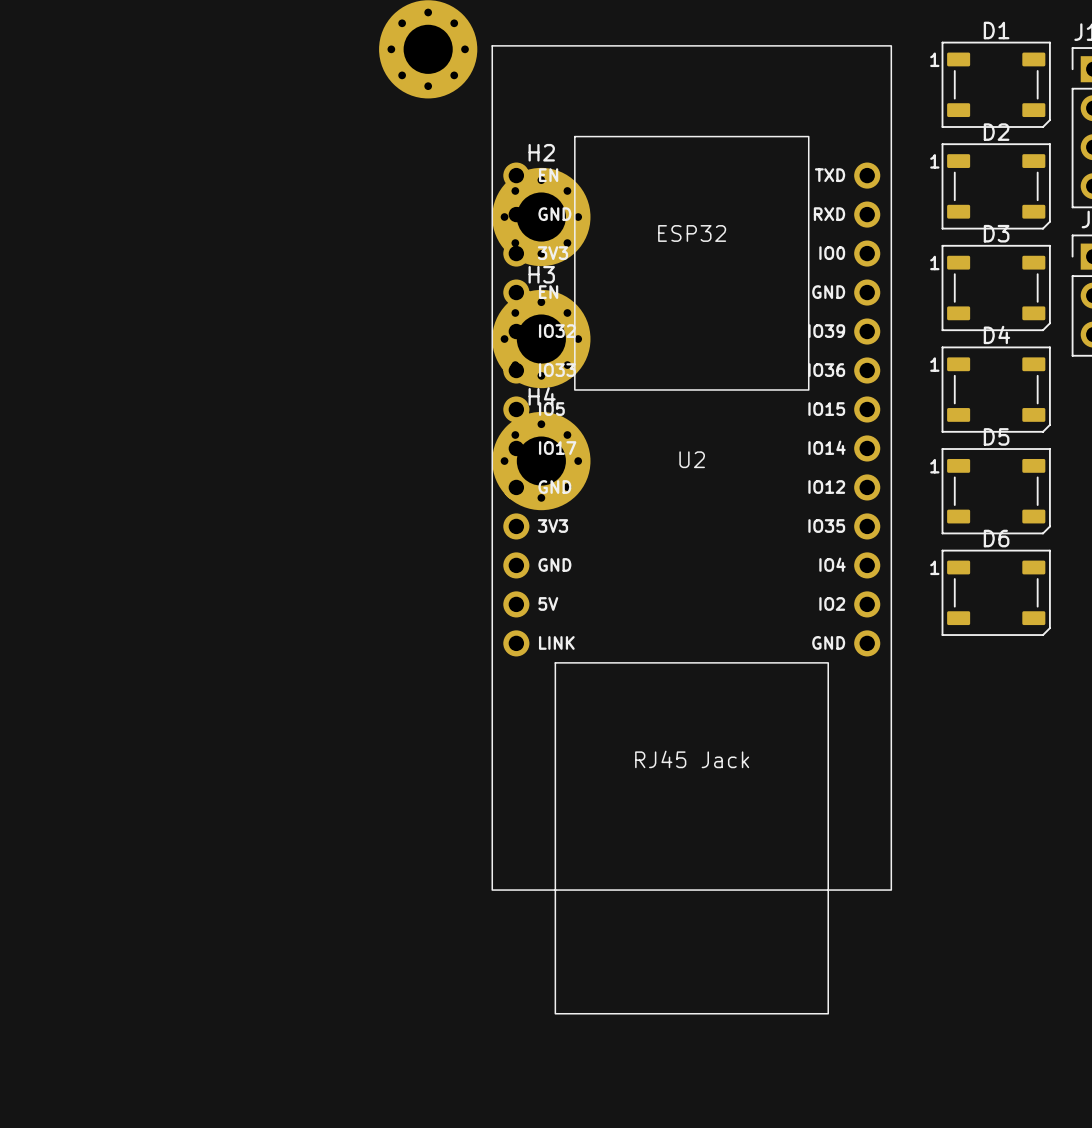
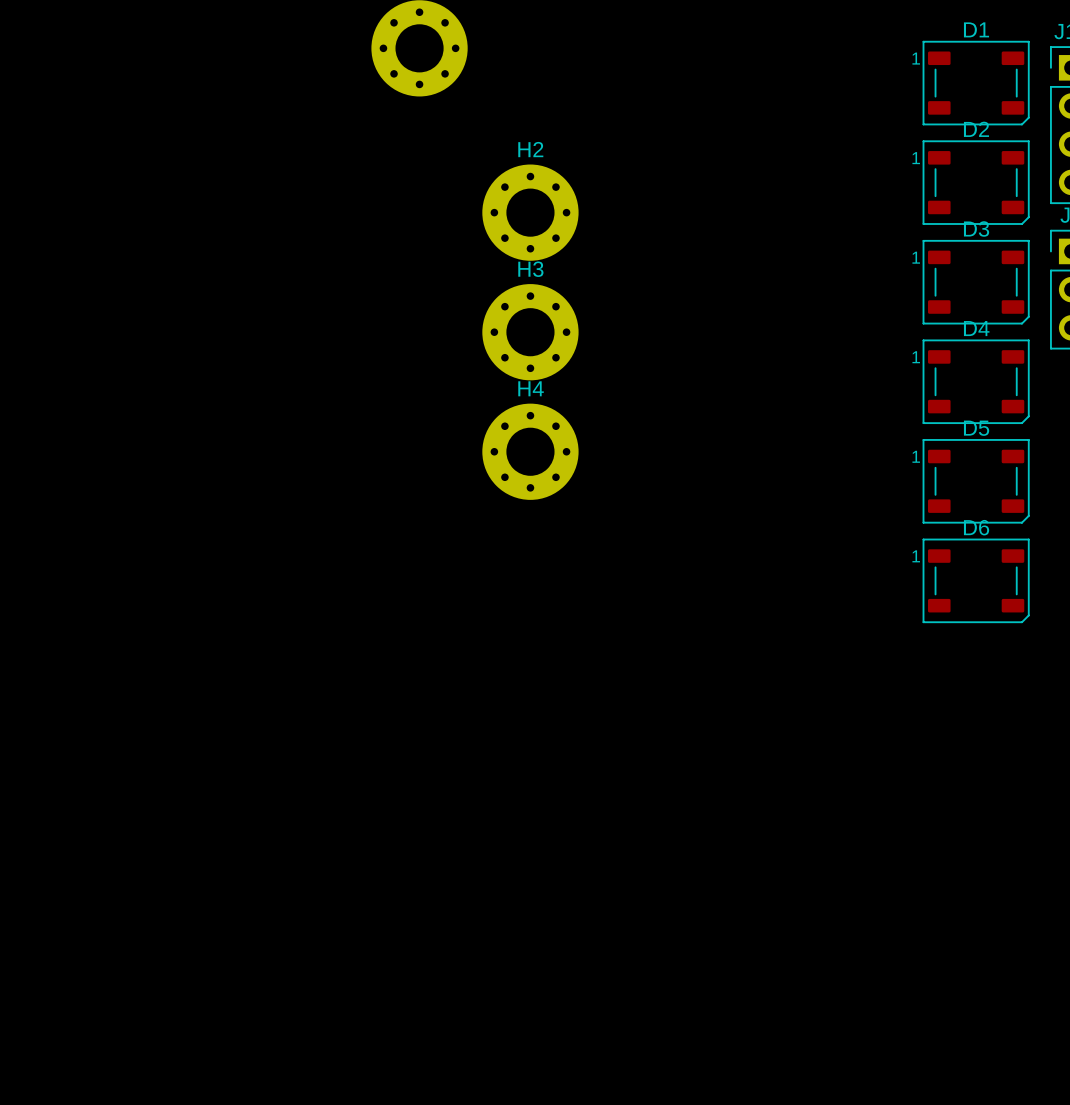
U2: (691, 529) -> none

